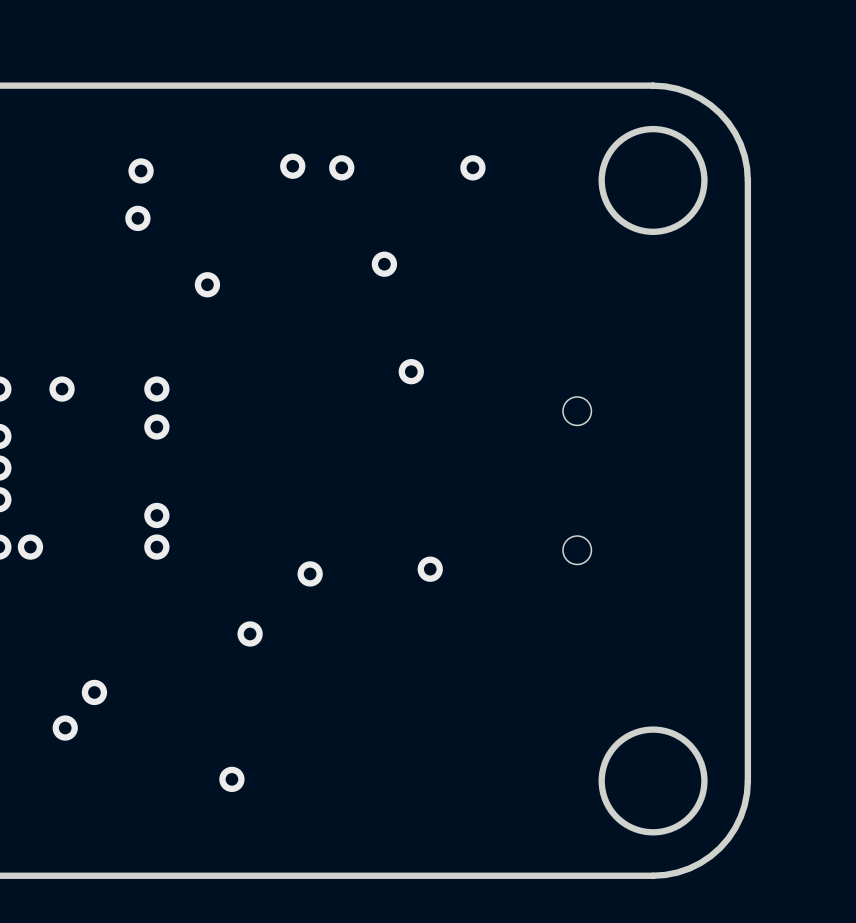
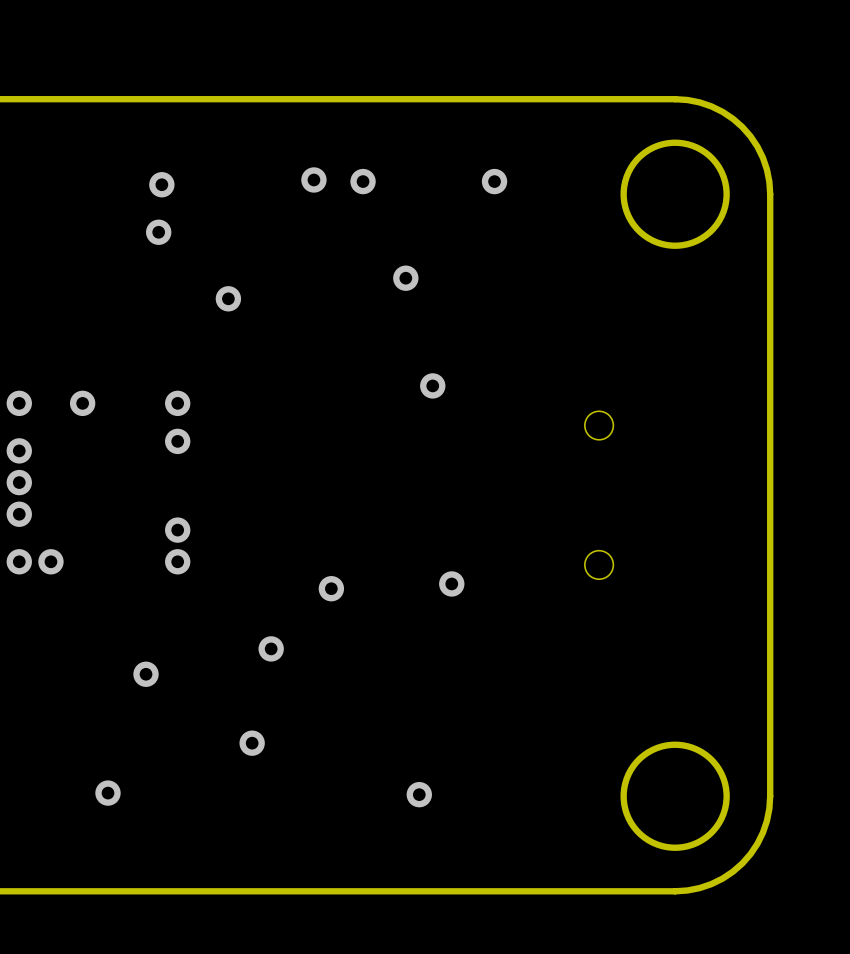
via: none -> (146, 674)
via: (94, 692) -> none
via: (65, 728) -> none
via: none -> (107, 793)
via position: (231, 779) -> (252, 743)
via: none -> (419, 794)

